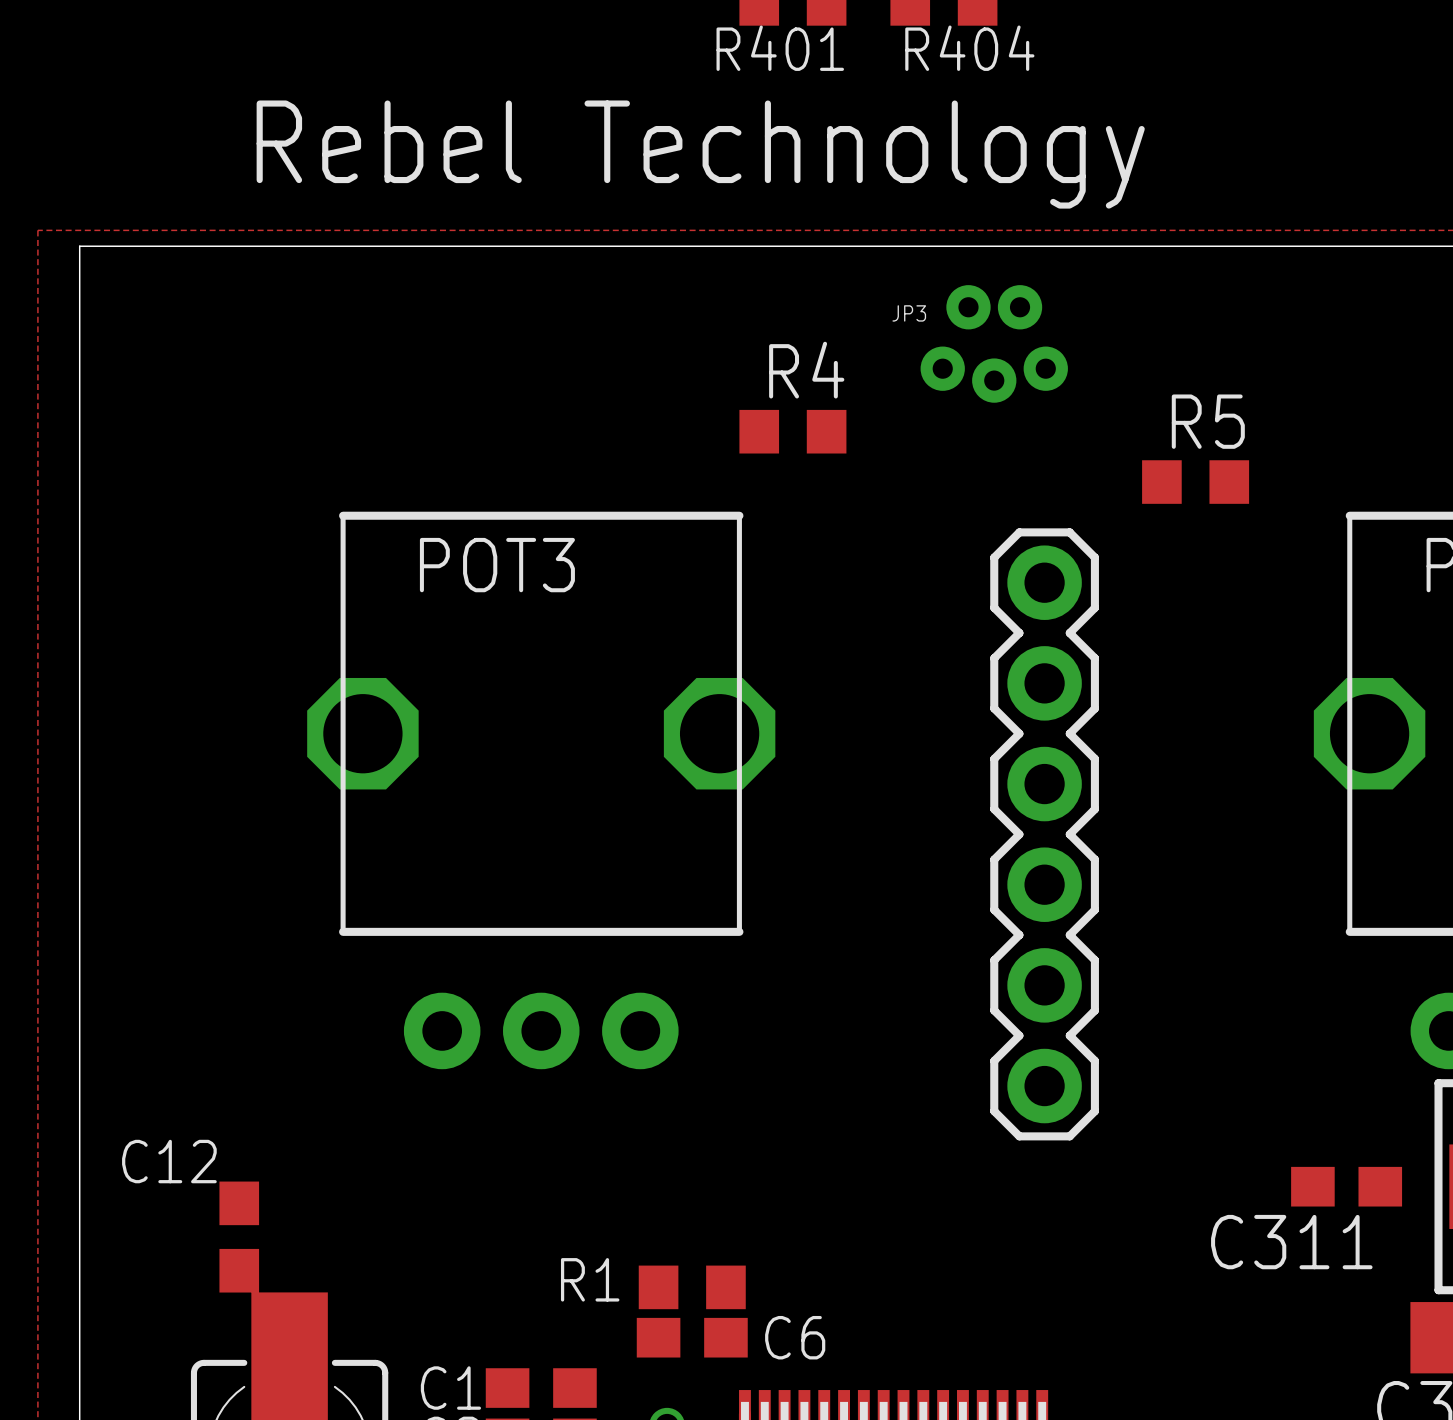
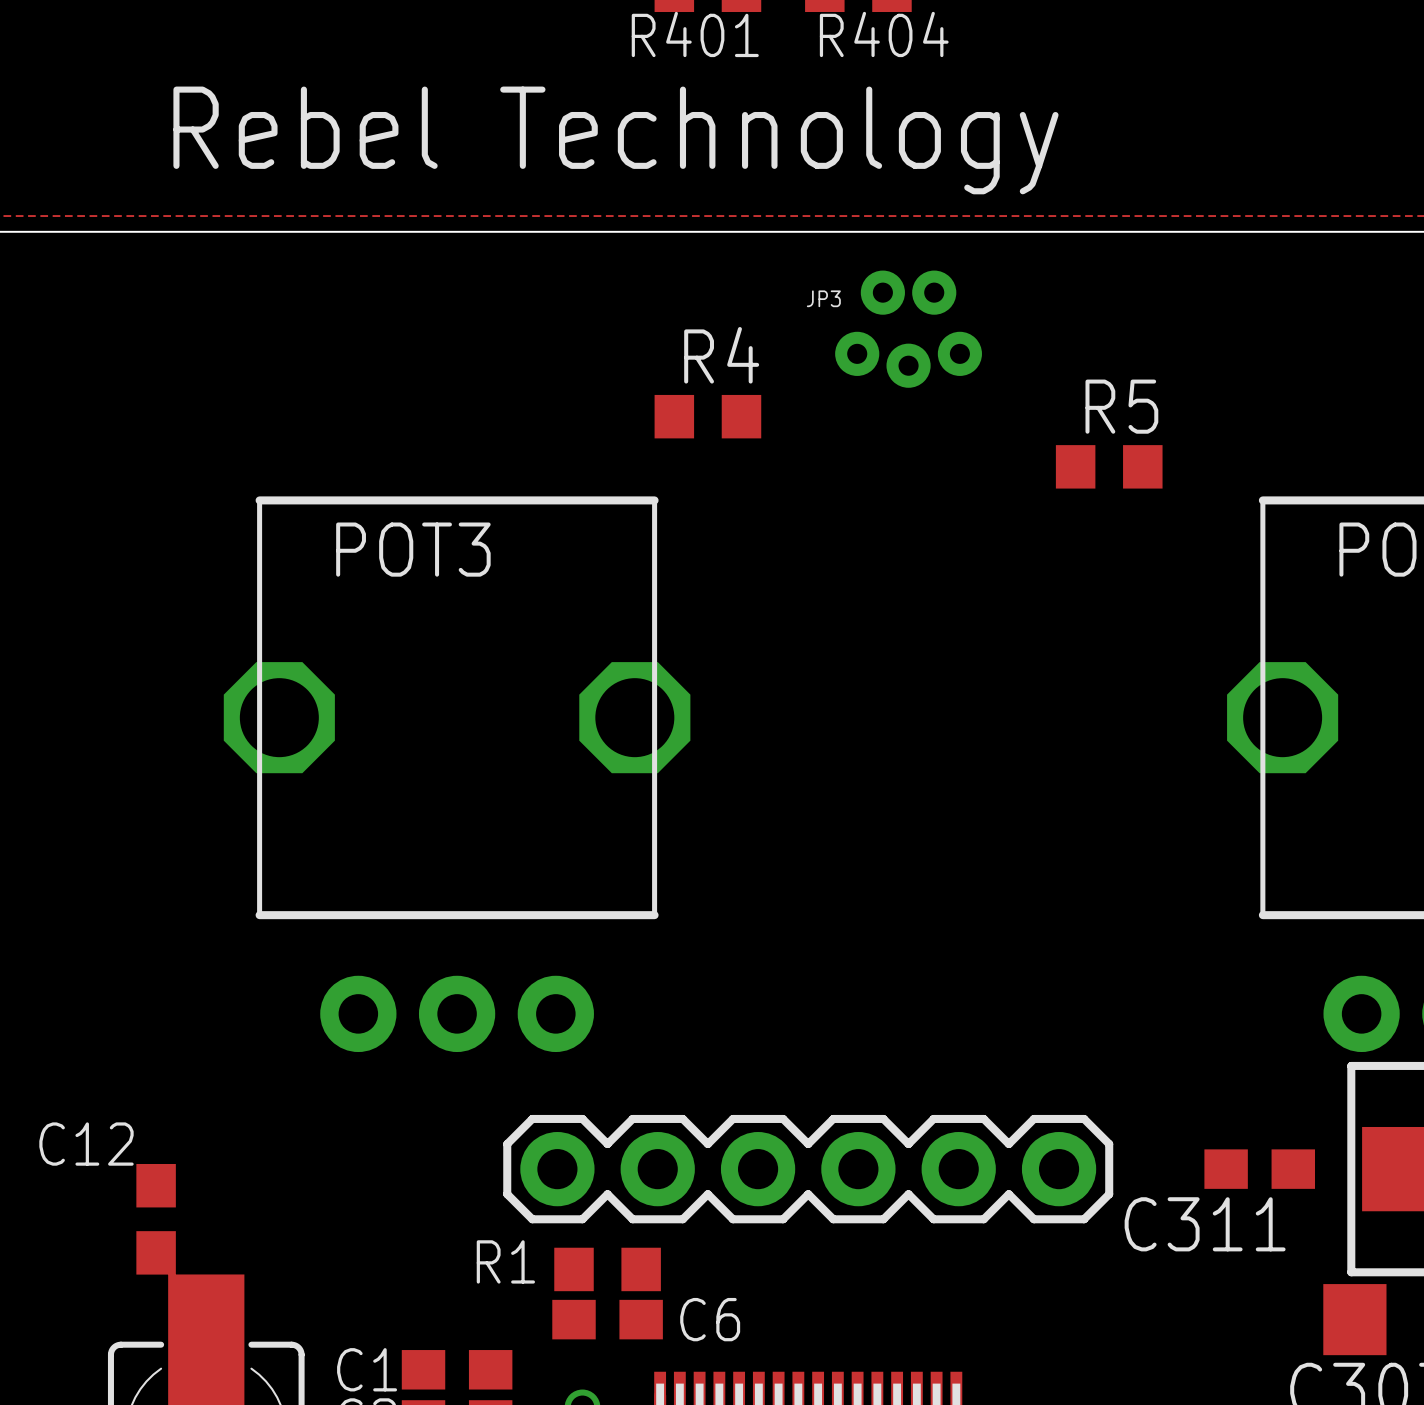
part rotation: 0° (1044, 834) -> 90° clockwise (808, 1169)
part position: (1044, 834) -> (808, 1169)

